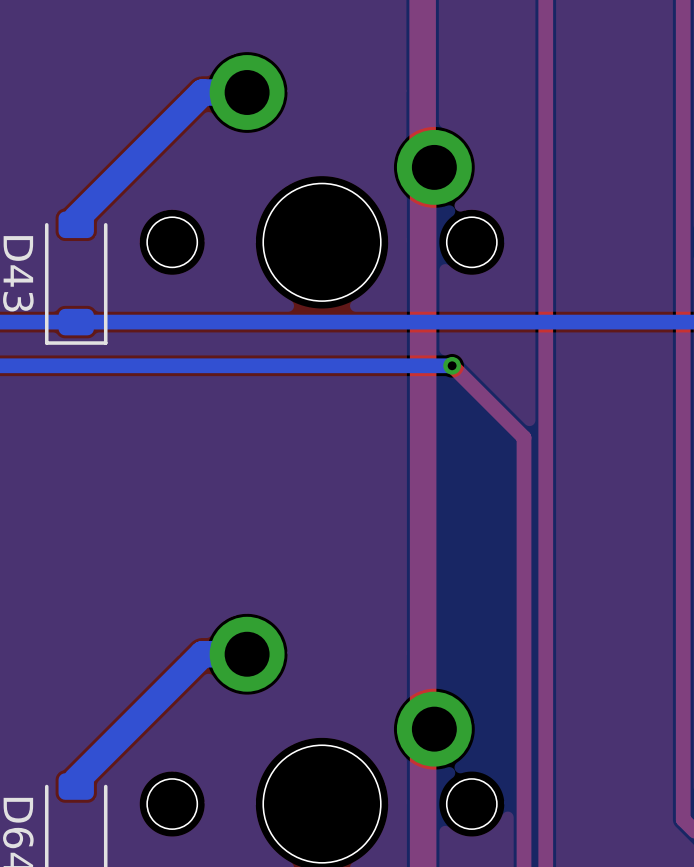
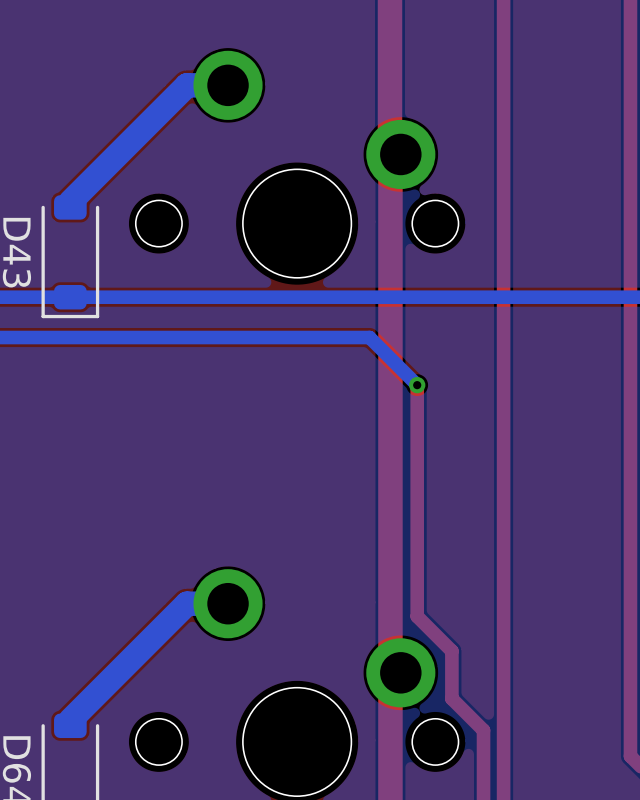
top track: (452, 365) (524, 437) (524, 791) -> (417, 385) (417, 616) (451, 651) (451, 698) (483, 730)
bottom track: (452, 365) (400, 365) -> (417, 385) (369, 337)
via position: (452, 365) -> (417, 385)

